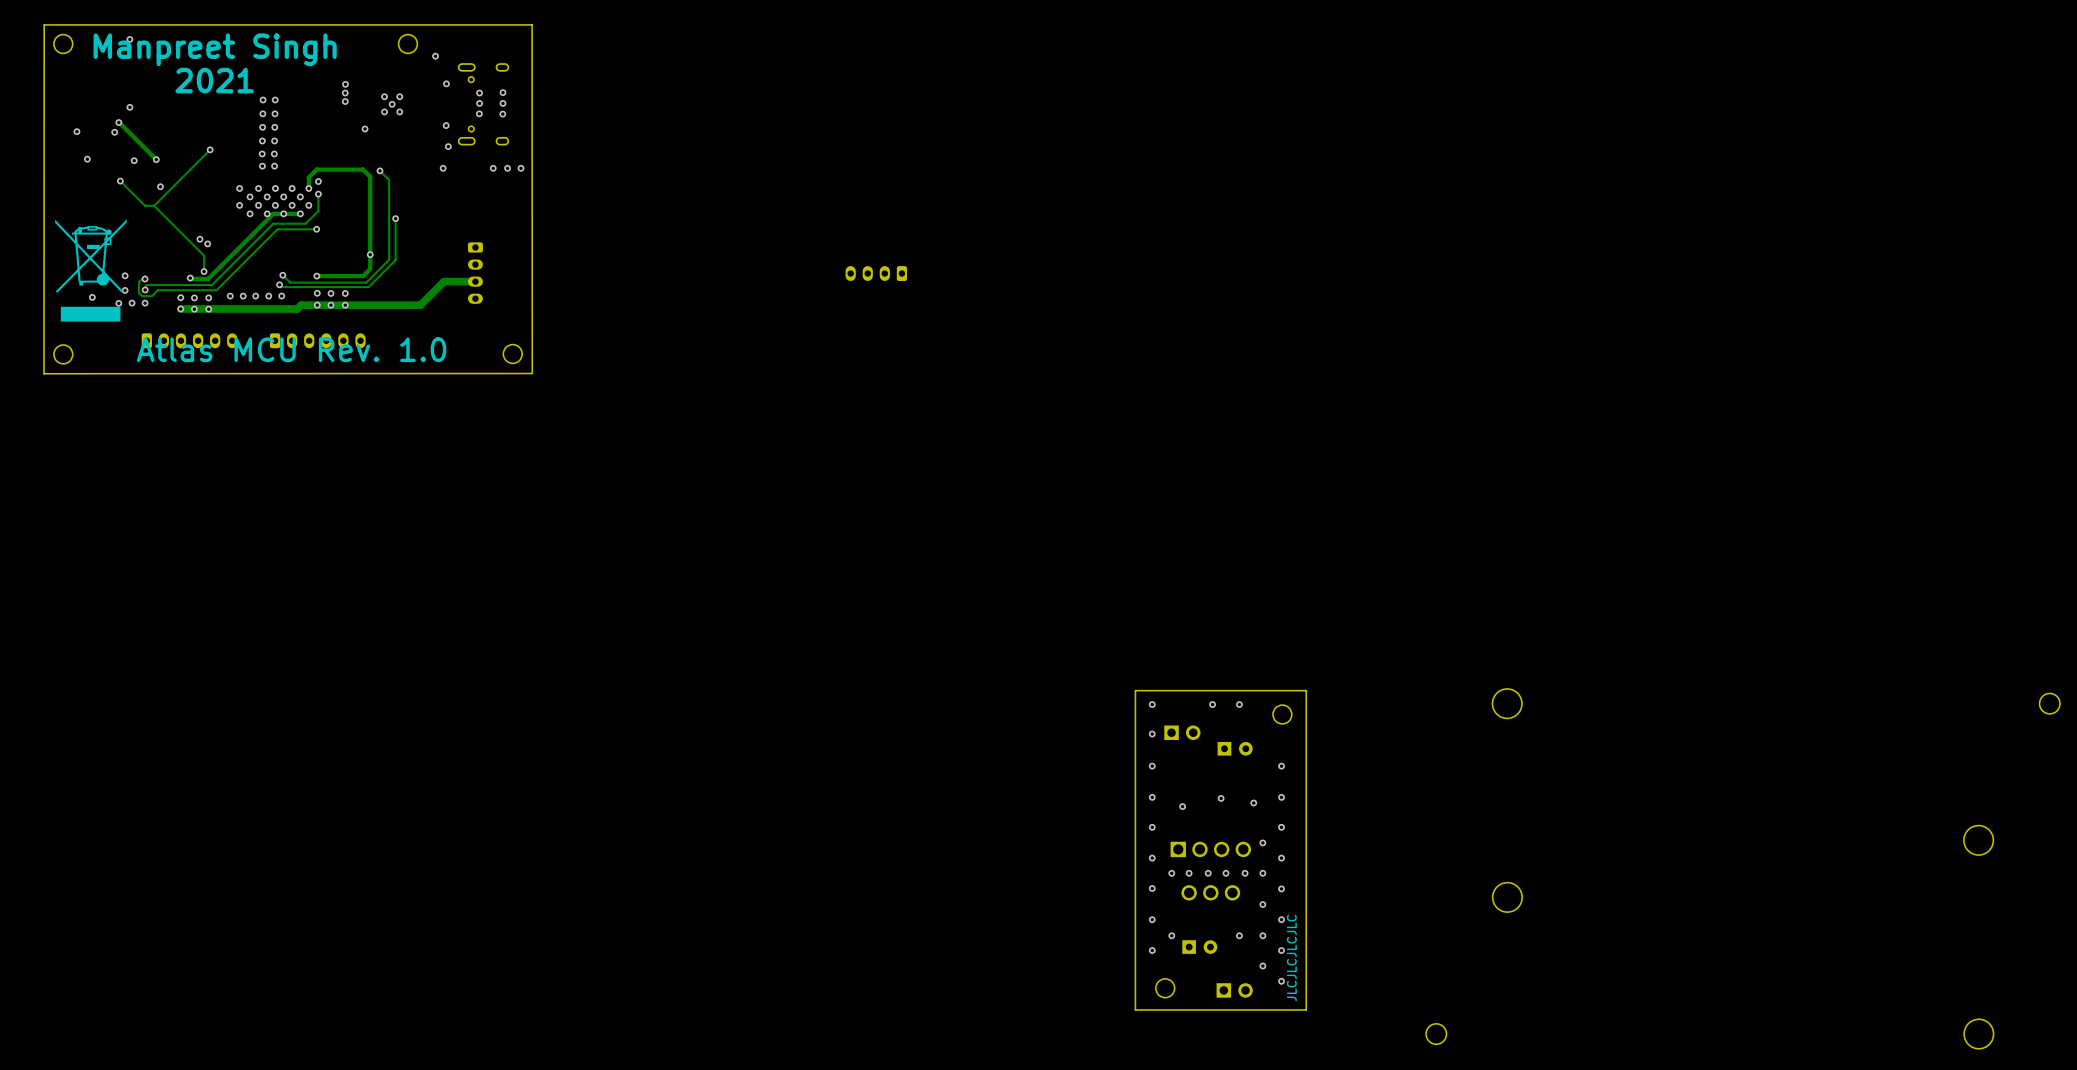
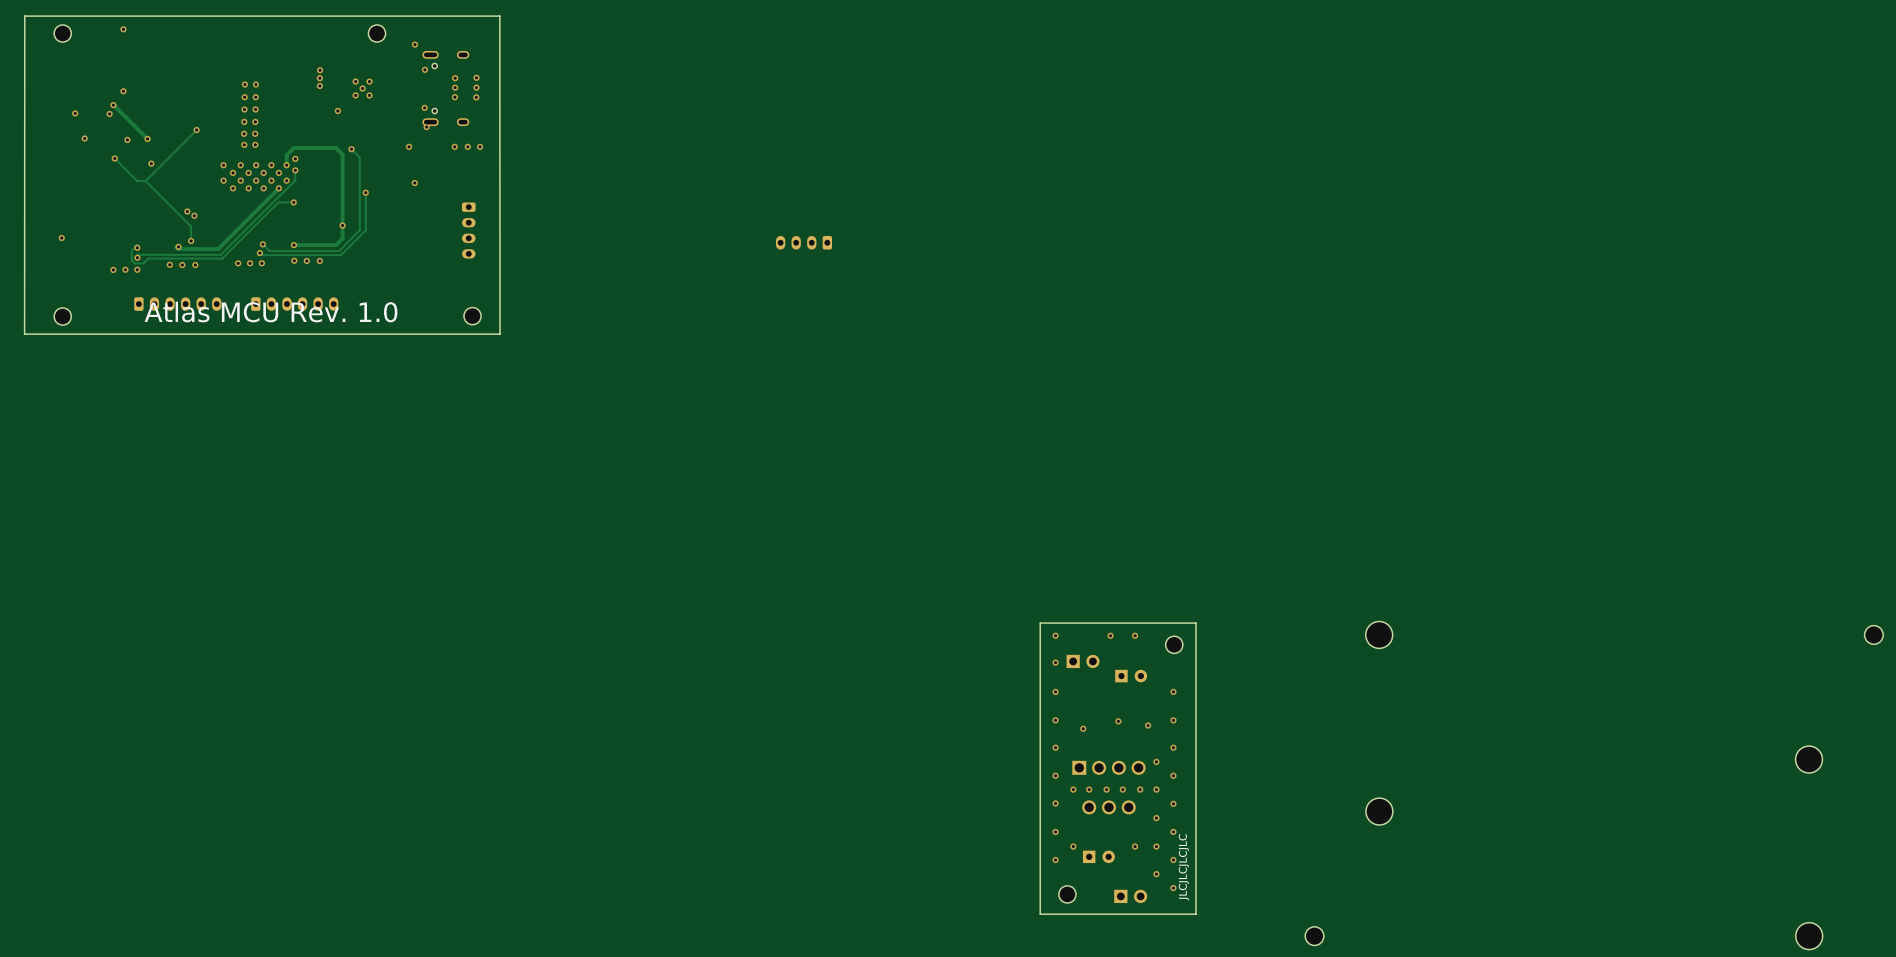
board edge: (532, 24) (532, 373) (43, 373) (44, 24) -> (490, 16) (499, 16) (500, 334) (24, 334) (24, 16) (45, 16)
text: Manpreet Singh (215, 49) -> none
via: (435, 56) -> none
via: none -> (414, 44)
text: 2021 (214, 80) -> none
via: (446, 83) -> none
via: none -> (424, 69)
via: (502, 92) -> none
via: none -> (476, 77)
via: (479, 93) -> none
via: none -> (455, 78)
via: (479, 103) -> none
via: none -> (455, 87)
via: (502, 103) -> none
via: none -> (476, 87)
via: (479, 113) -> none
via: none -> (454, 97)
via: (502, 114) -> none
via: none -> (476, 97)
via: (446, 125) -> none
via: none -> (424, 107)
via: (448, 146) -> none
via: none -> (426, 127)
track: (318, 205) (318, 211) (305, 223) (273, 223) (212, 284) (147, 284) (145, 286) -> (295, 180) (220, 254) (137, 254)
via: none -> (414, 183)
track: (300, 213) (273, 213) (208, 278) (190, 278) -> (278, 188) (218, 249) (178, 249) (176, 246)
drawing: [55, 219, 127, 322] -> none
track: (299, 229) (277, 229) (216, 290) (157, 290) -> (278, 202) (222, 258) (148, 258)
via: none -> (61, 238)
part position: (475, 273) -> (468, 230)
via: (125, 275) -> none
track: (475, 281) (443, 281) (420, 305) (301, 305) (297, 308) (180, 308) -> none
via: (125, 290) -> none
via: (230, 296) -> none
via: (243, 296) -> none
via: (92, 297) -> none
via: (317, 305) -> none
via: (330, 305) -> none
via: (345, 305) -> none
via: (180, 308) -> none
via: (194, 309) -> none
via: (208, 309) -> none

